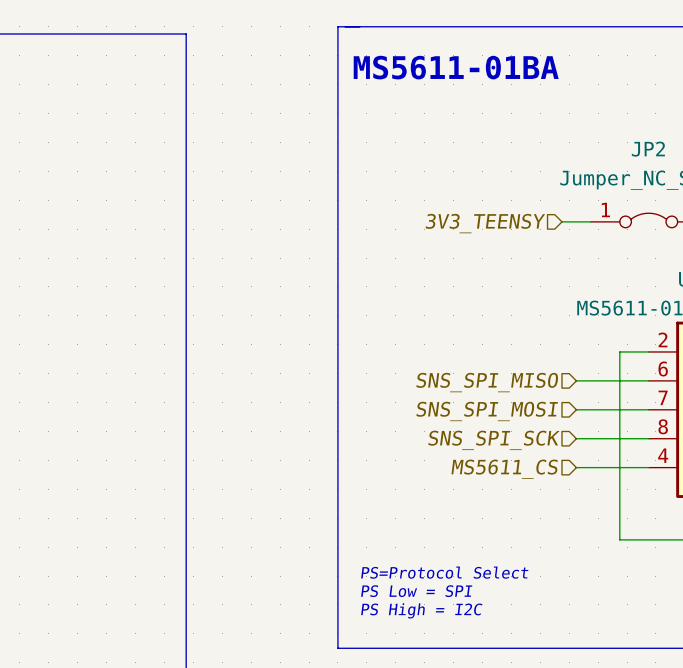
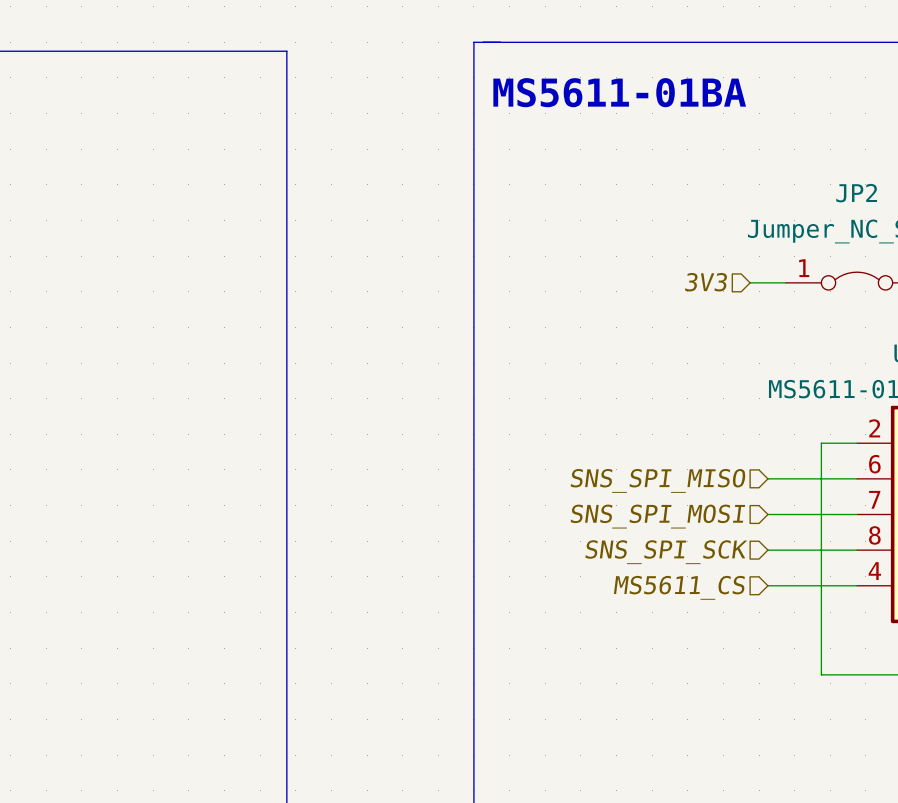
hierarchical label: 3V3_TEENSY (485, 223) -> 3V3 (706, 282)
text: PS=Protocol Select (444, 572) -> none
text: PS Low = SPI (416, 591) -> none
text: PS High = I2C (421, 610) -> none

